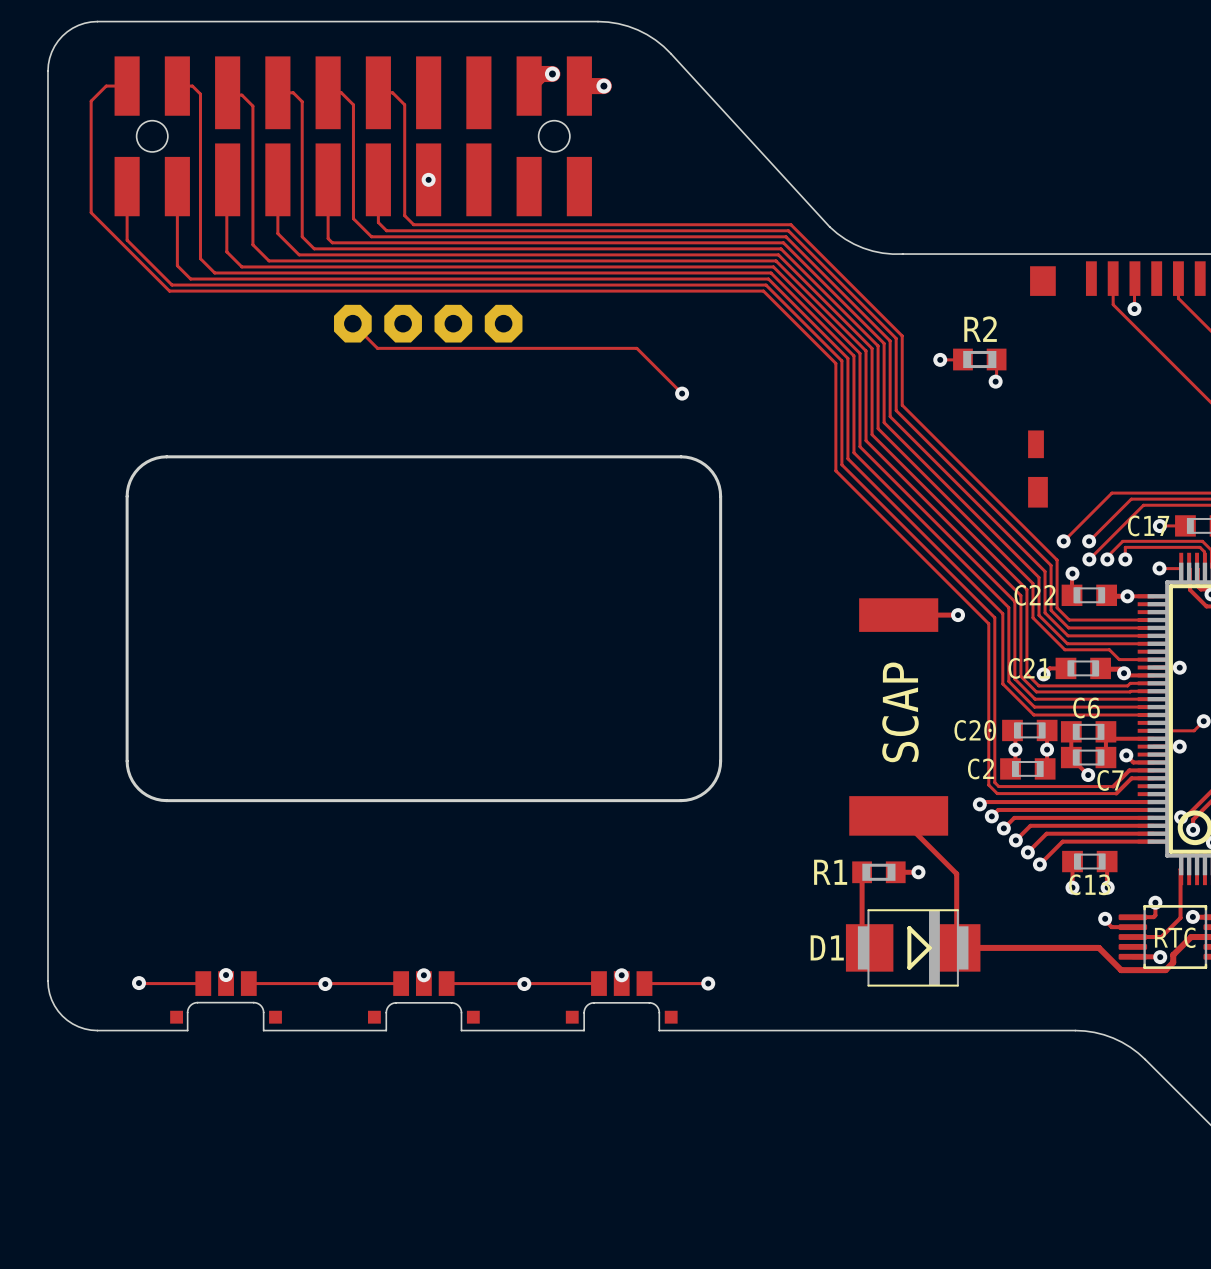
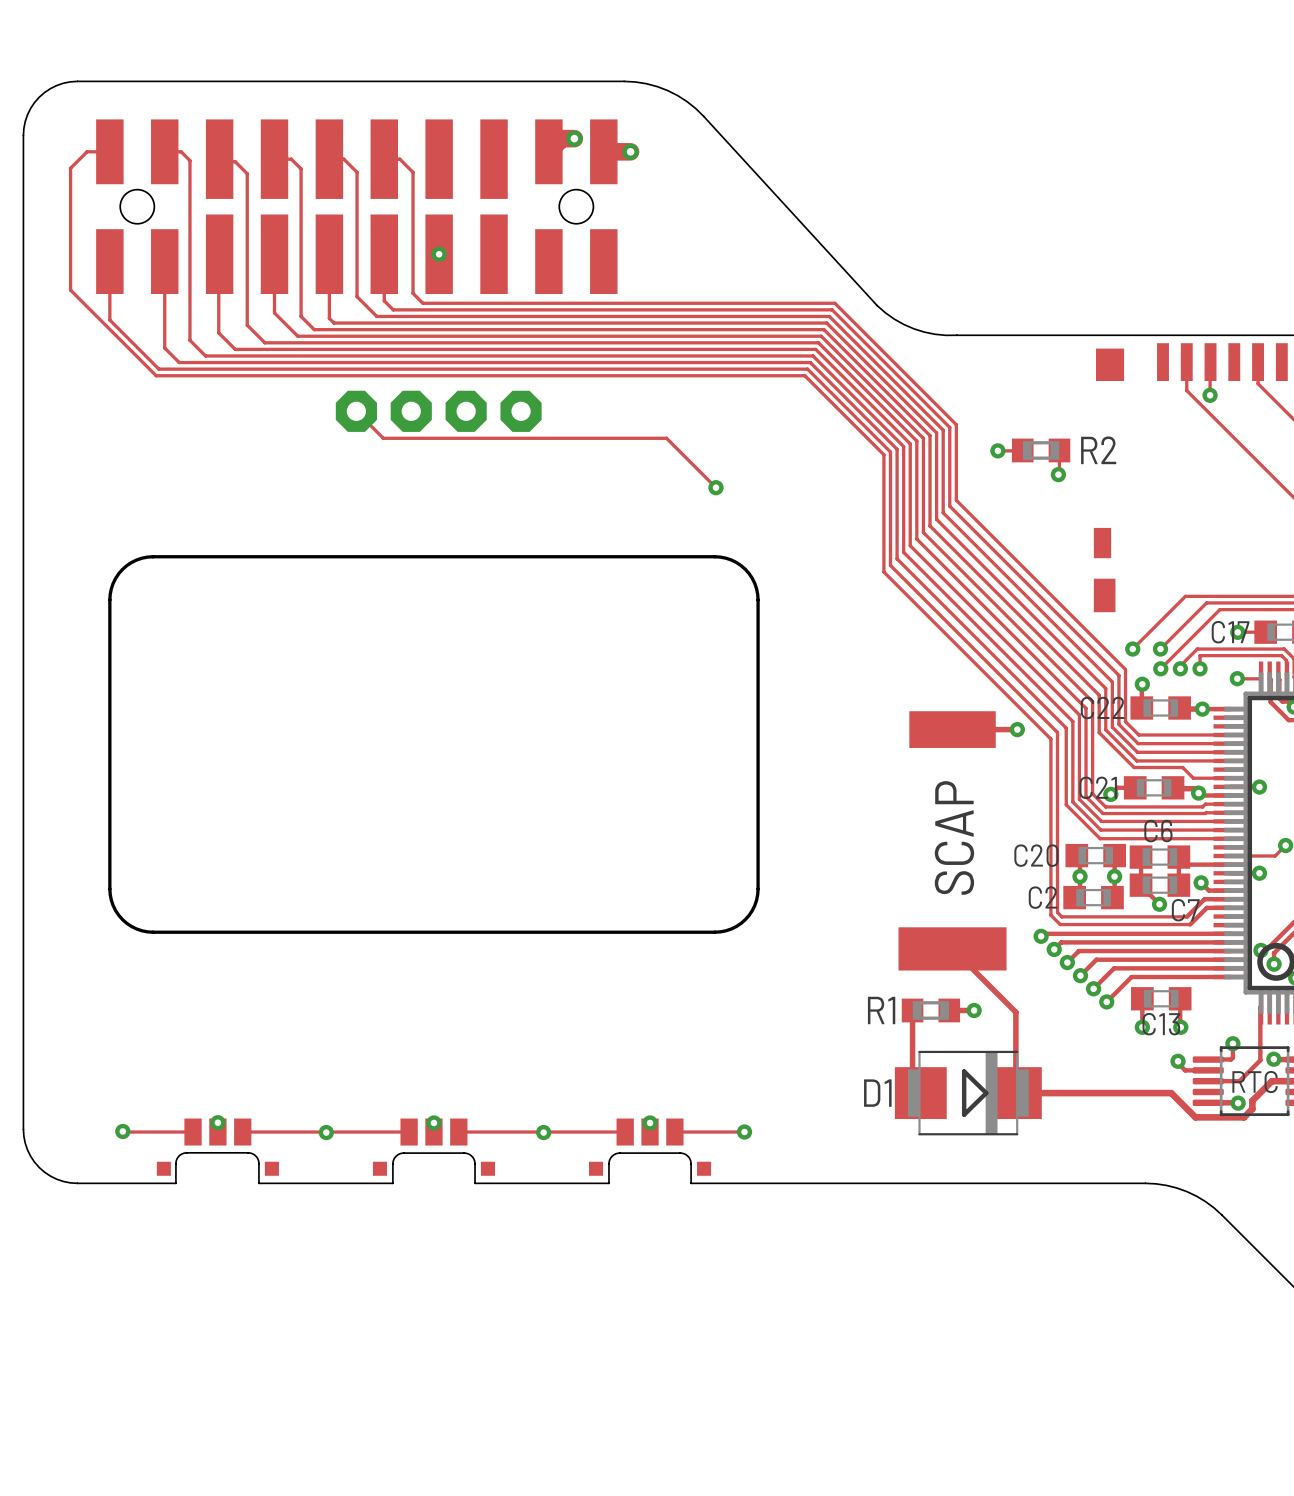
R2 name position: R2 (980, 329) -> R2 (1098, 450)

